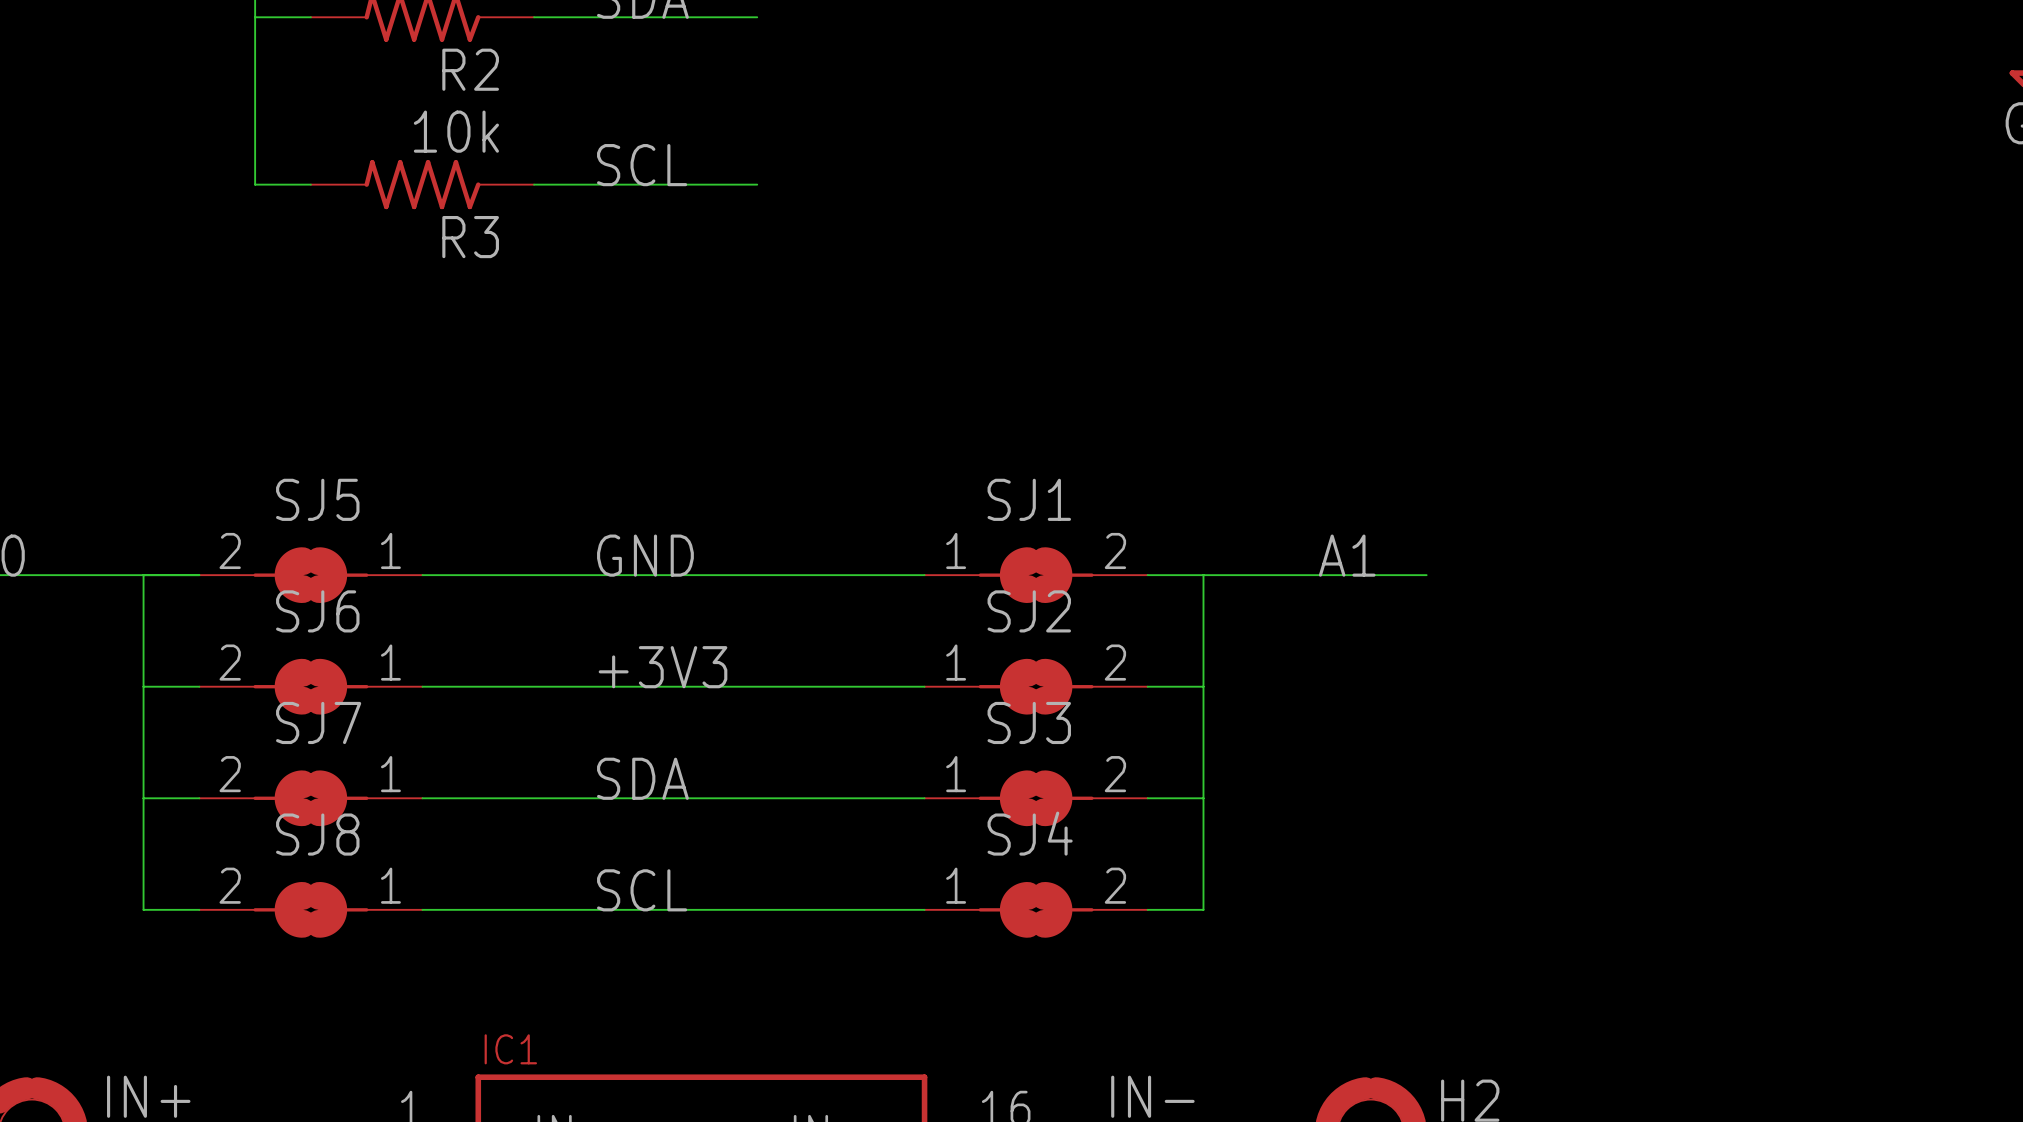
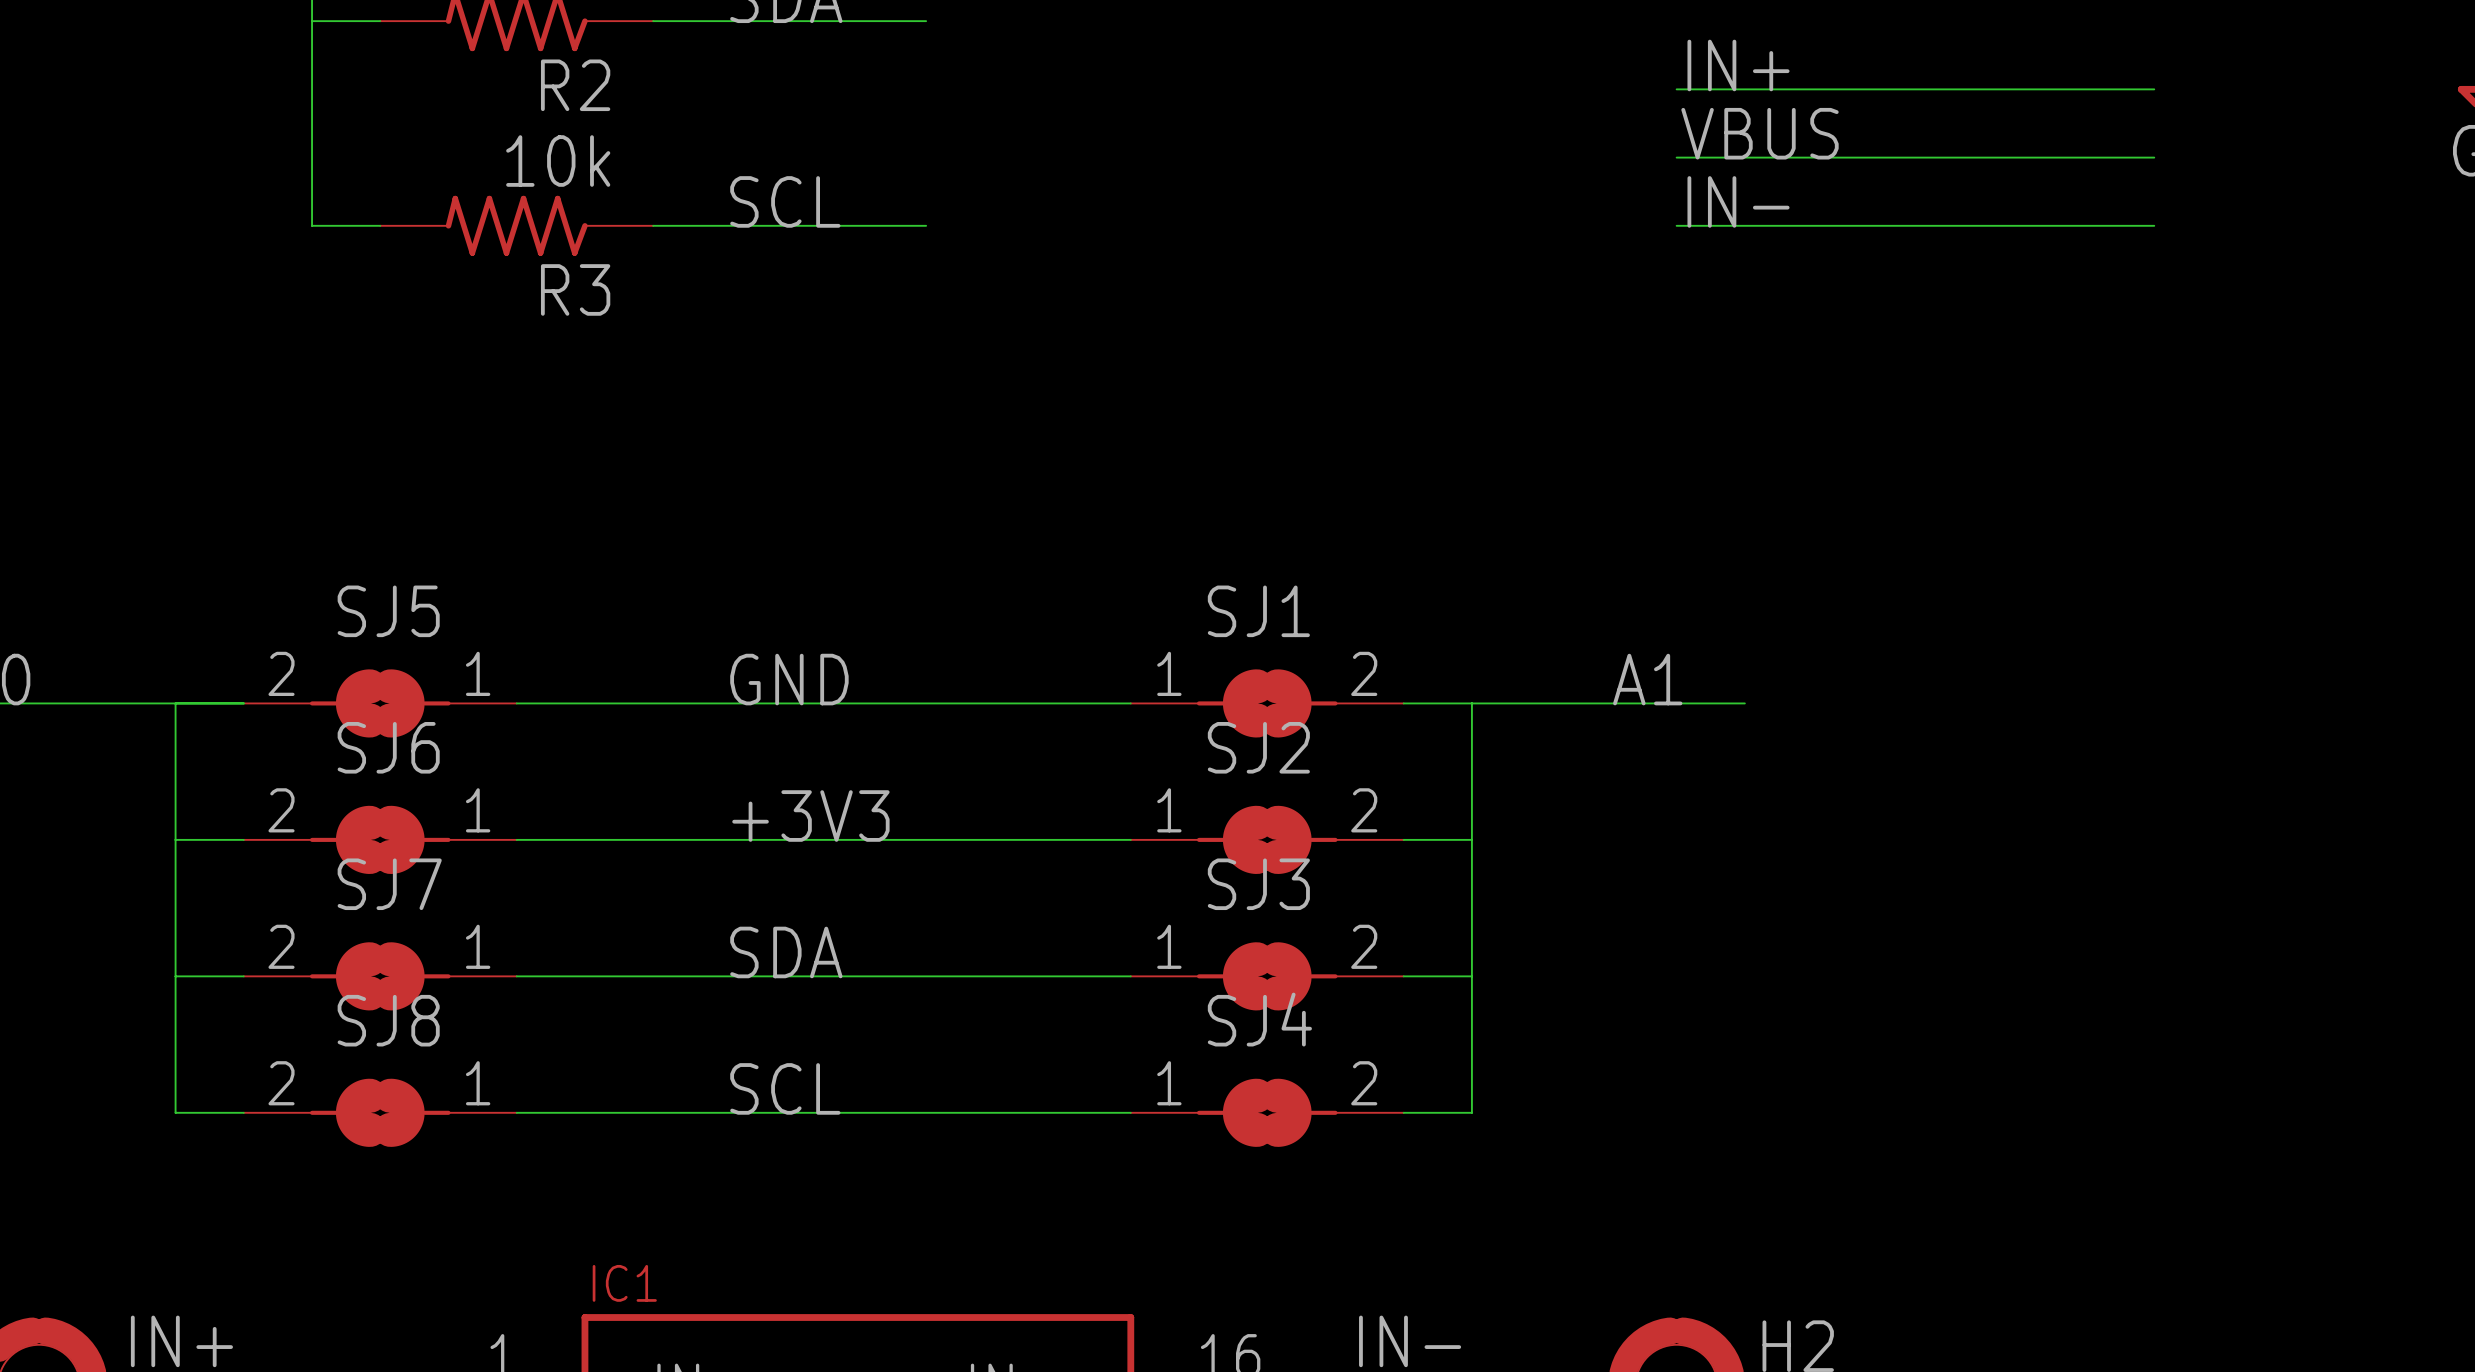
label: none -> IN+ (1738, 65)
wire: none -> (1676, 89) (2154, 89)
label: none -> VBUS (1760, 133)
wire: none -> (1676, 157) (2154, 157)
label: none -> IN- (1738, 201)
wire: none -> (1676, 225) (2154, 225)

